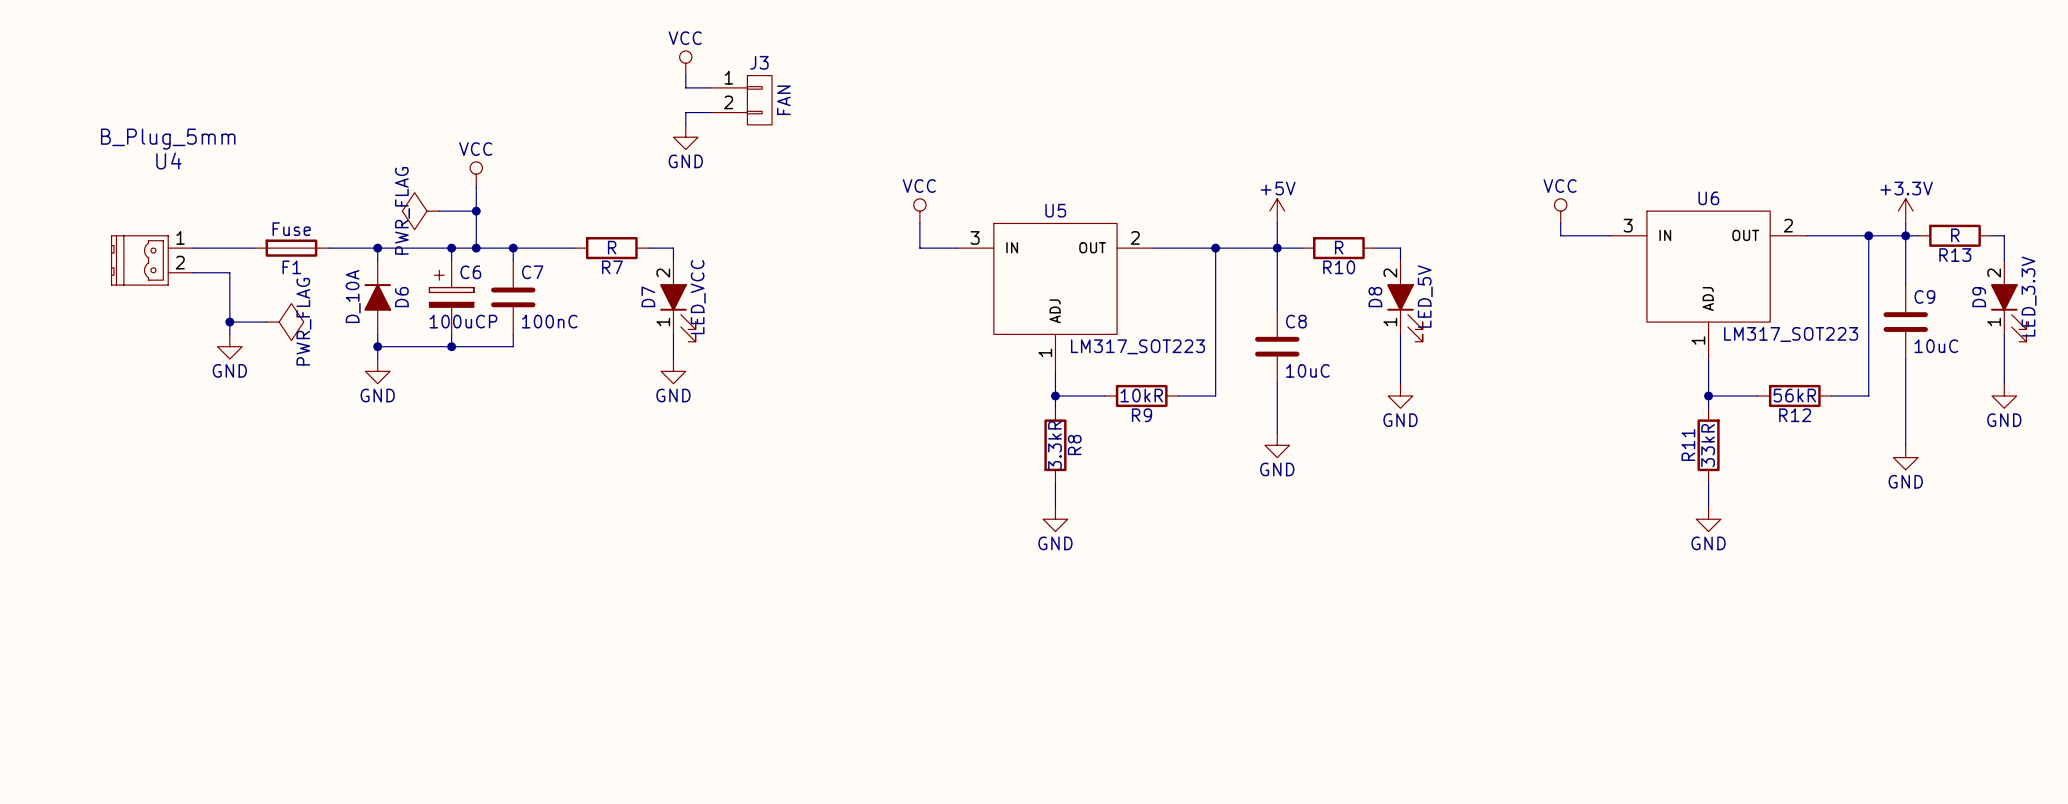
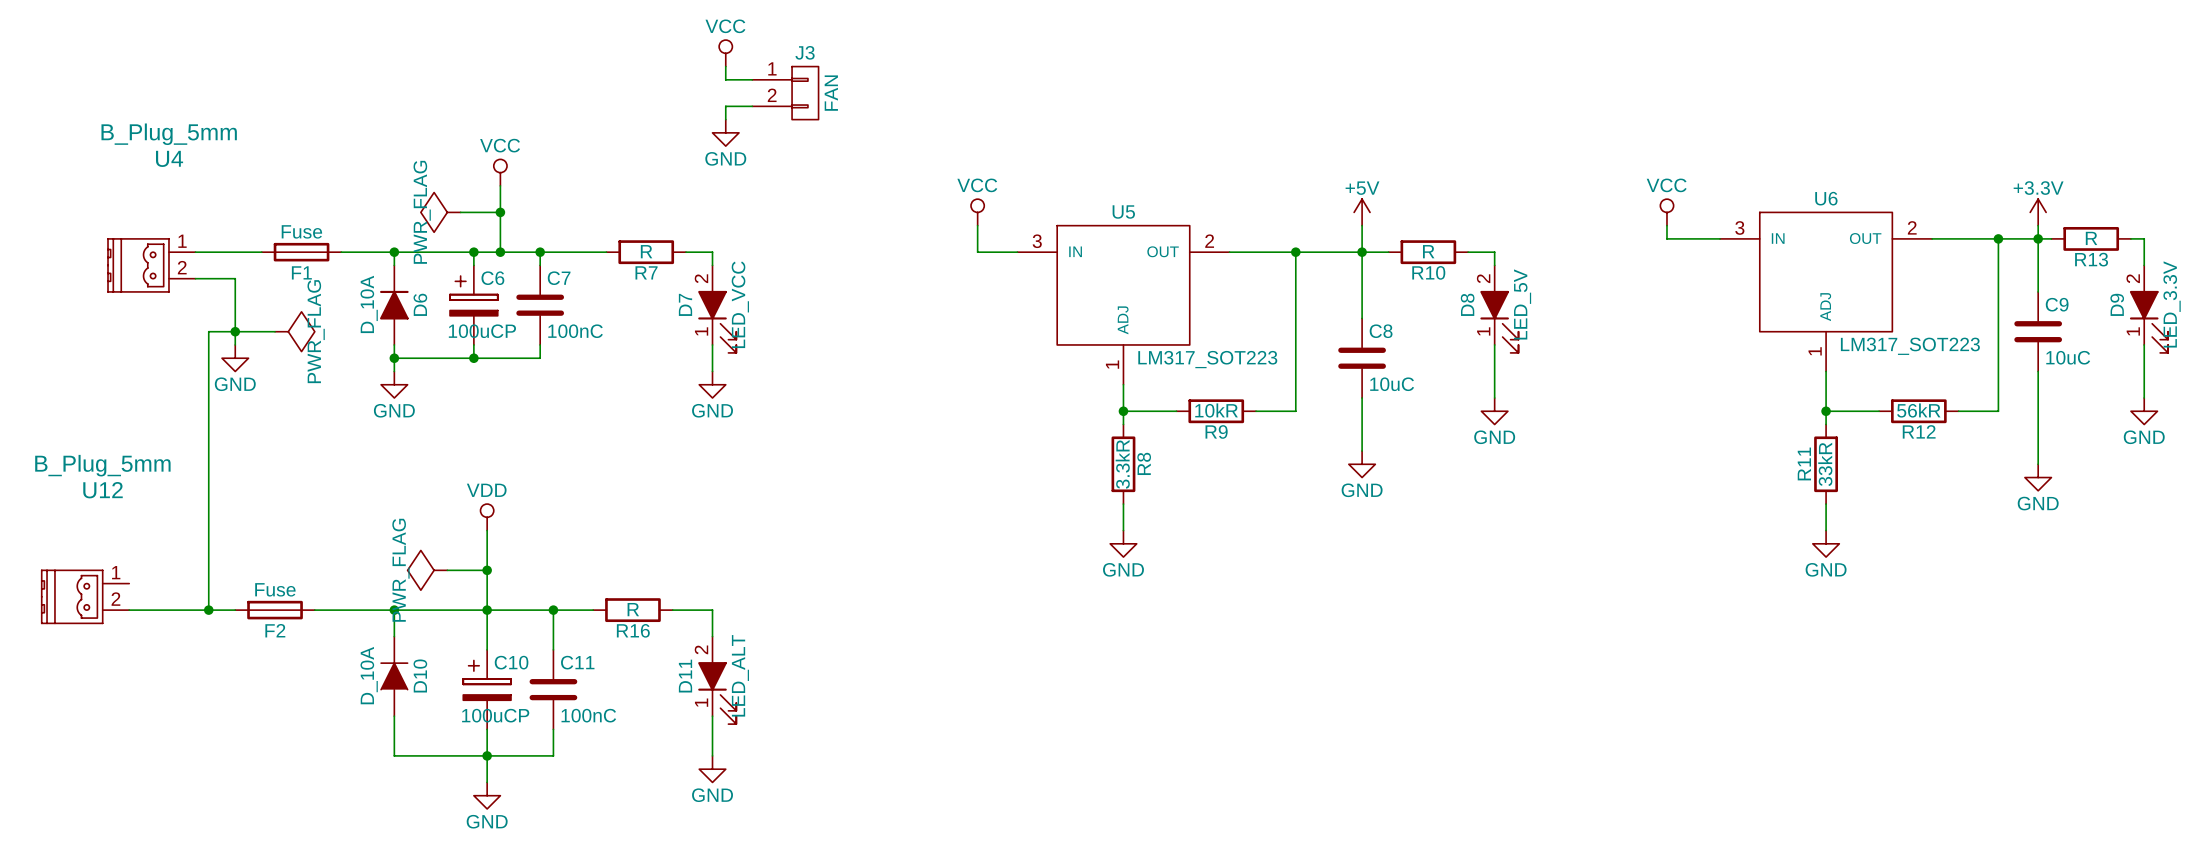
wire: none -> (235, 331) (208, 331) (208, 610)
power symbol: none -> VDD (487, 517)
wire: none -> (487, 530) (487, 649)
power symbol: none -> PWR_FLAG (427, 570)
wire: none -> (447, 570) (487, 570)
junction: none -> (487, 570)
U12: none -> B_Plug_5mm (85, 596)
wire: none -> (129, 610) (235, 610)
junction: none -> (208, 610)
F2: none -> Fuse (275, 610)
wire: none -> (314, 610) (593, 610)
wire: none -> (394, 610) (394, 636)
junction: none -> (394, 610)
junction: none -> (487, 610)
wire: none -> (553, 610) (553, 649)
junction: none -> (553, 610)
R16: none -> R (632, 610)
wire: none -> (672, 610) (712, 610) (712, 636)
D10: none -> D_10A (394, 676)
D11: none -> LED_ALT (717, 680)
C10: none -> 100uCP (487, 689)
C11: none -> 100nC (553, 689)
wire: none -> (394, 716) (394, 755) (553, 755) (553, 729)
wire: none -> (712, 716) (712, 755)
wire: none -> (487, 729) (487, 782)
junction: none -> (487, 755)
power symbol: none -> GND (712, 769)
power symbol: none -> GND (487, 795)

